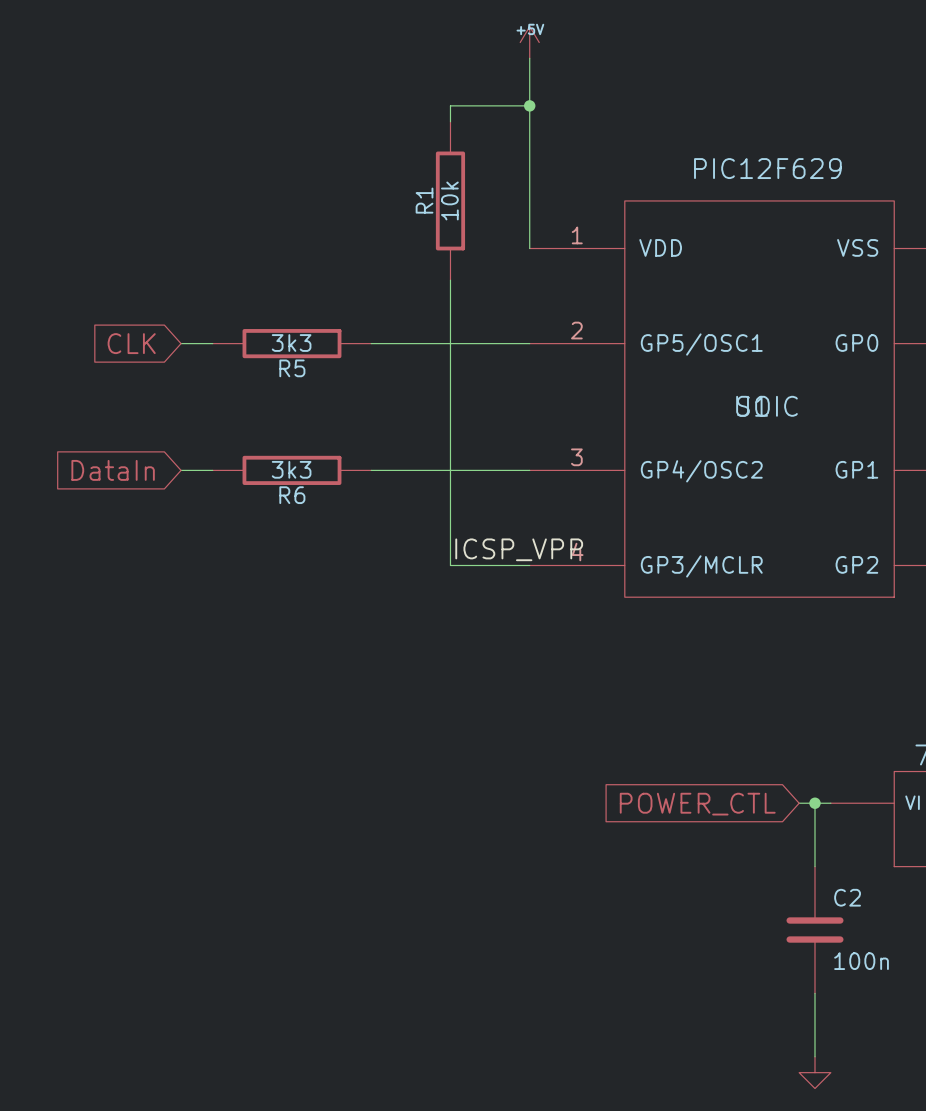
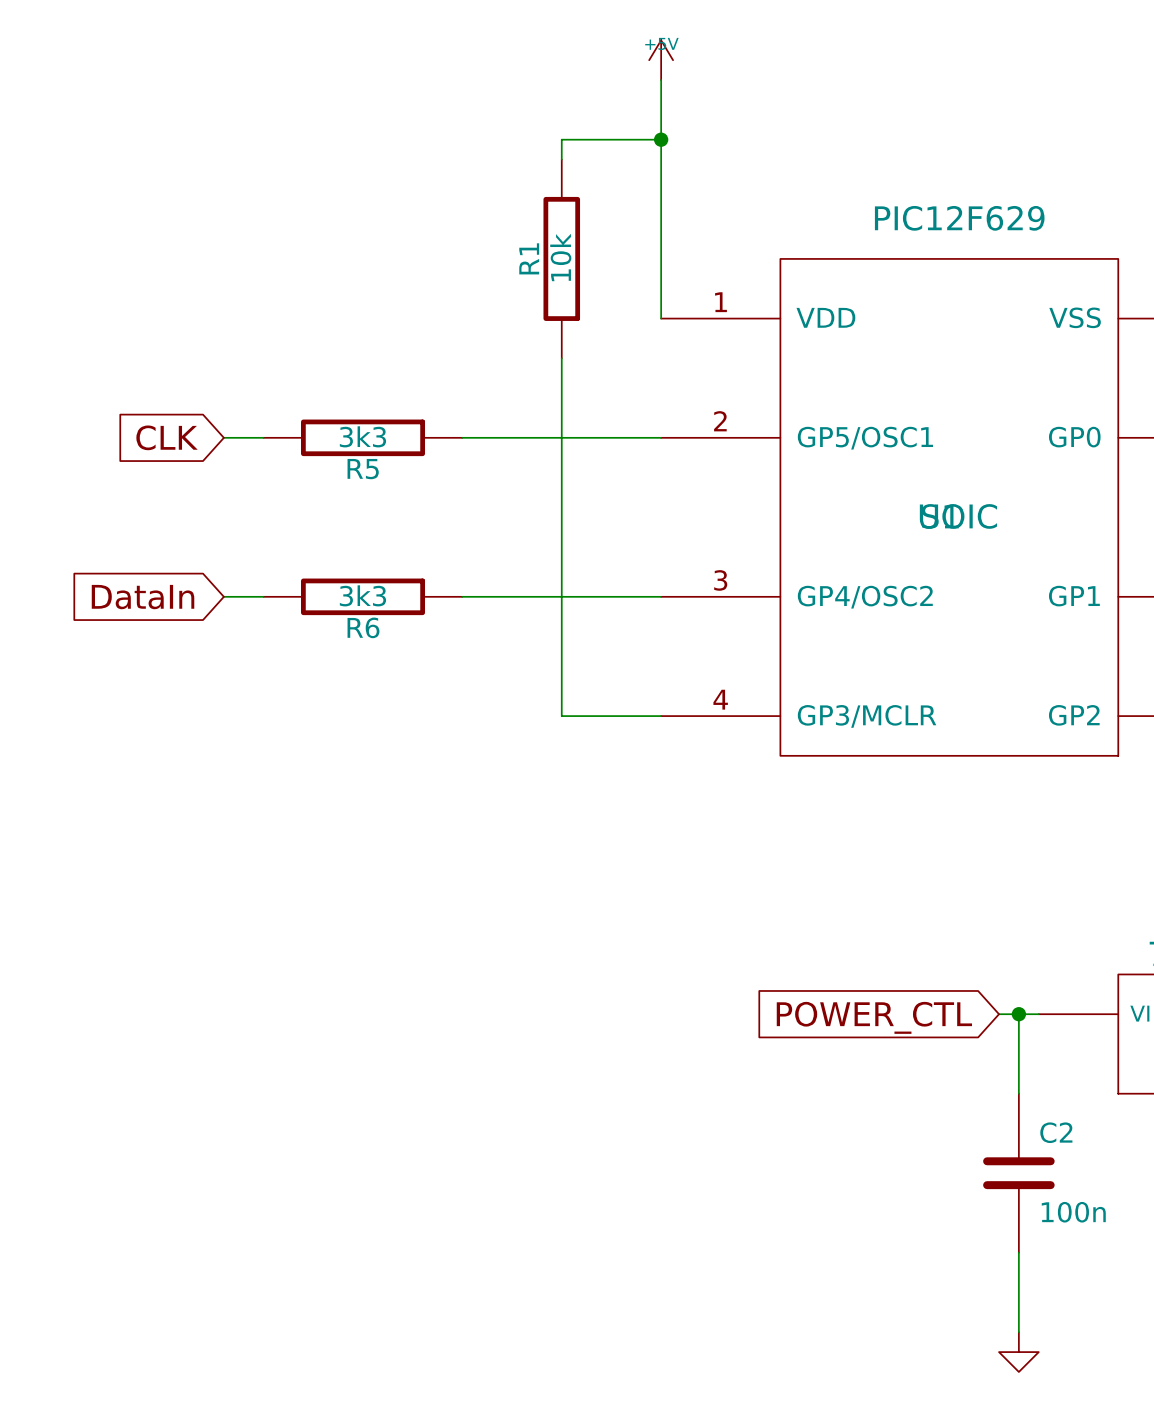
label: ICSP_VPP (519, 549) -> none

